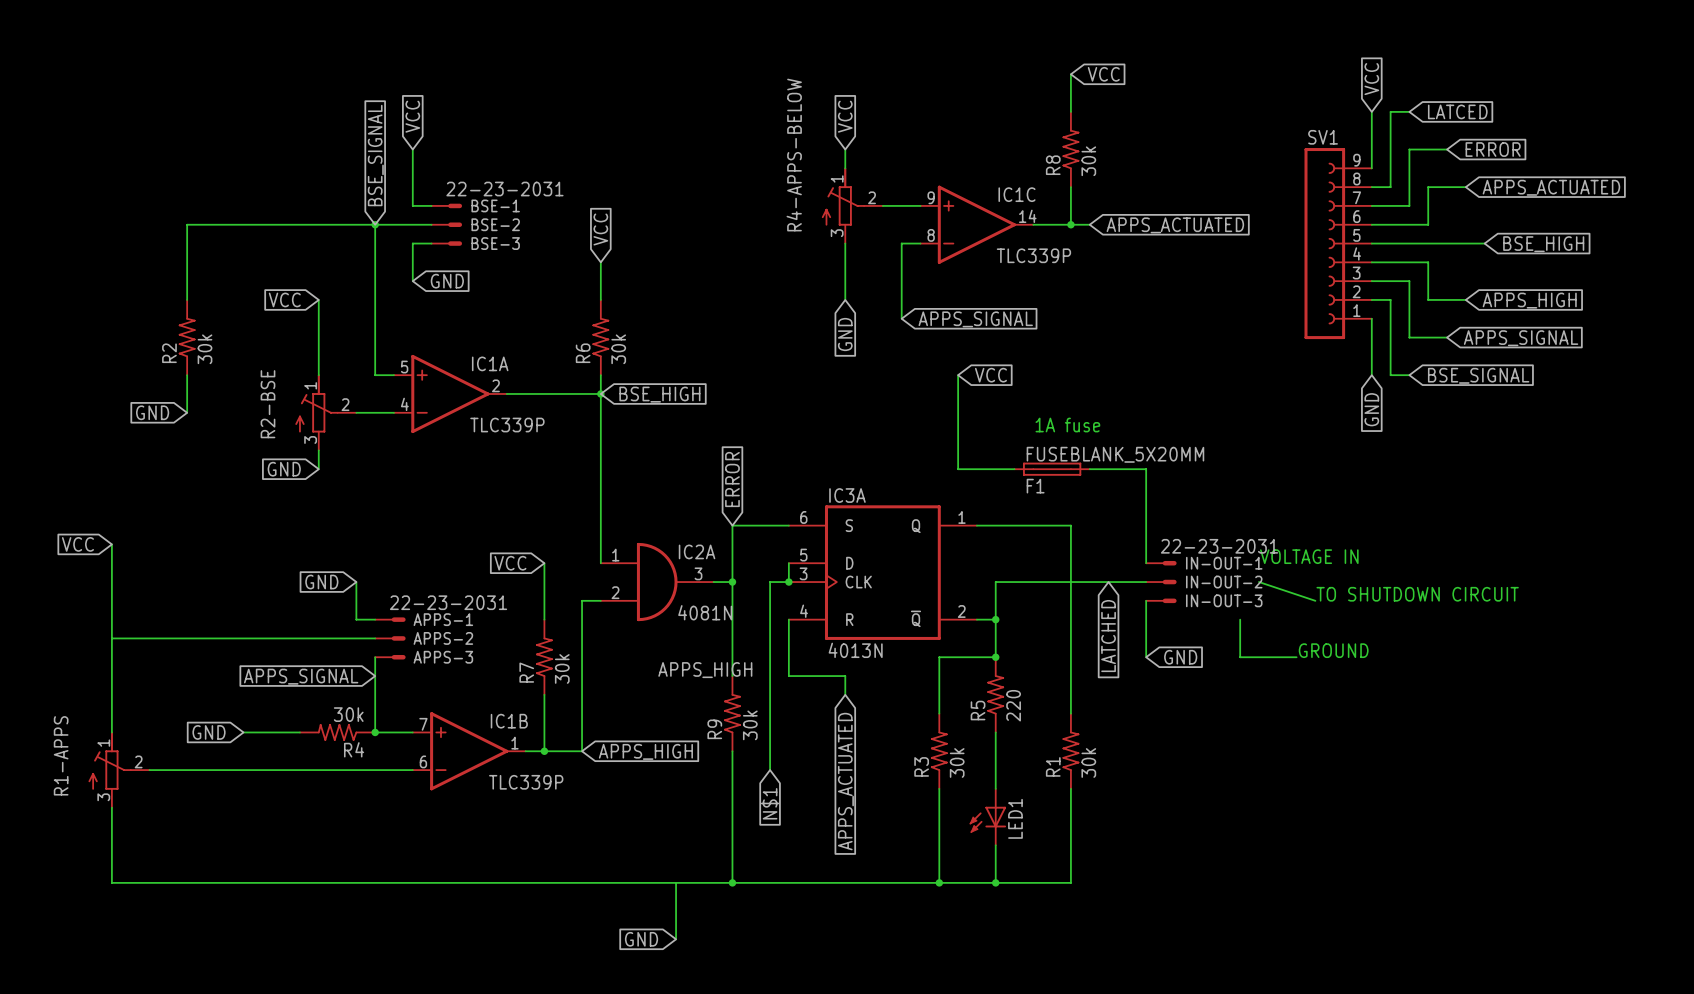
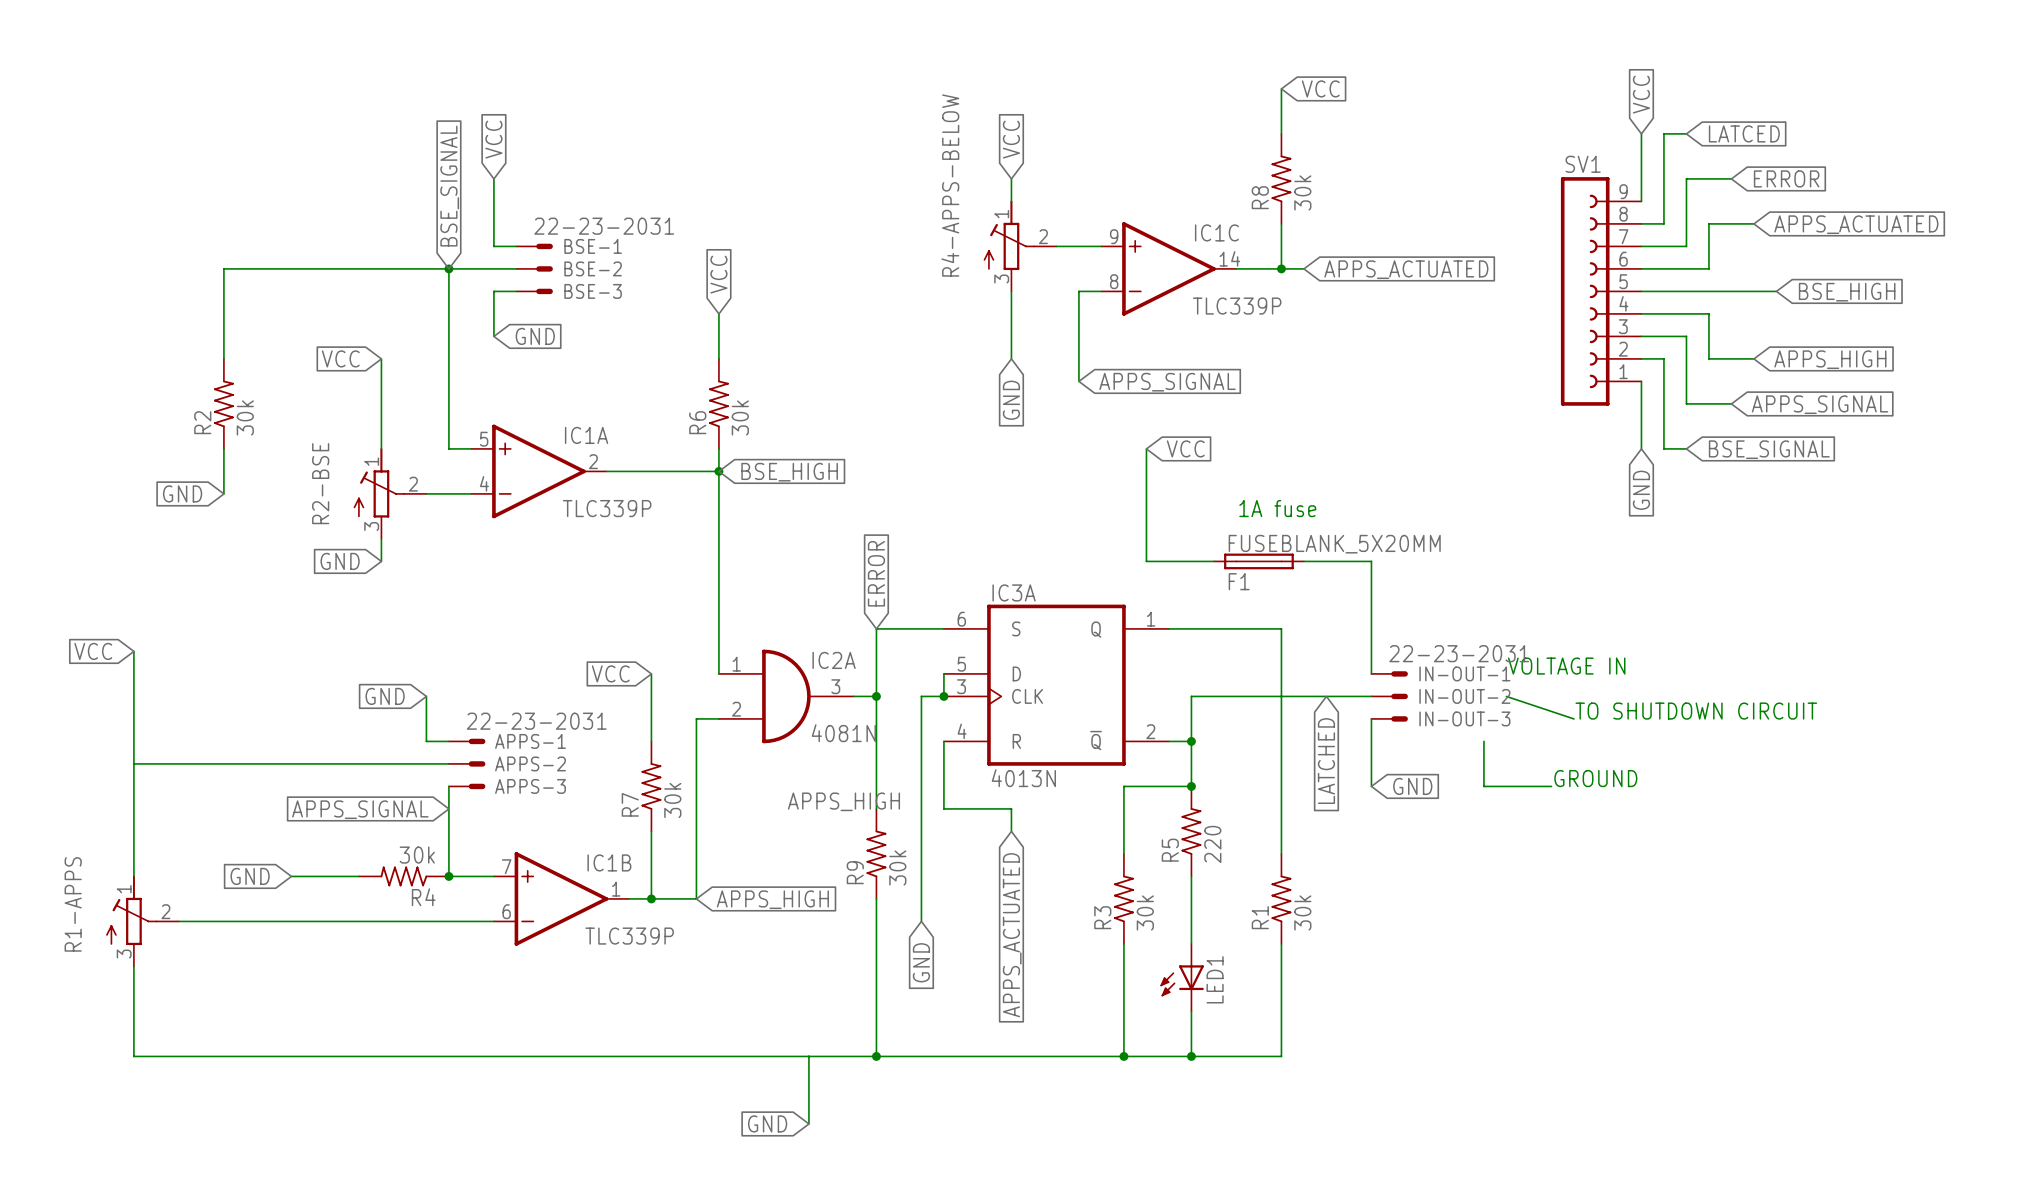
global label: N$1 (770, 803) -> GND (921, 962)

